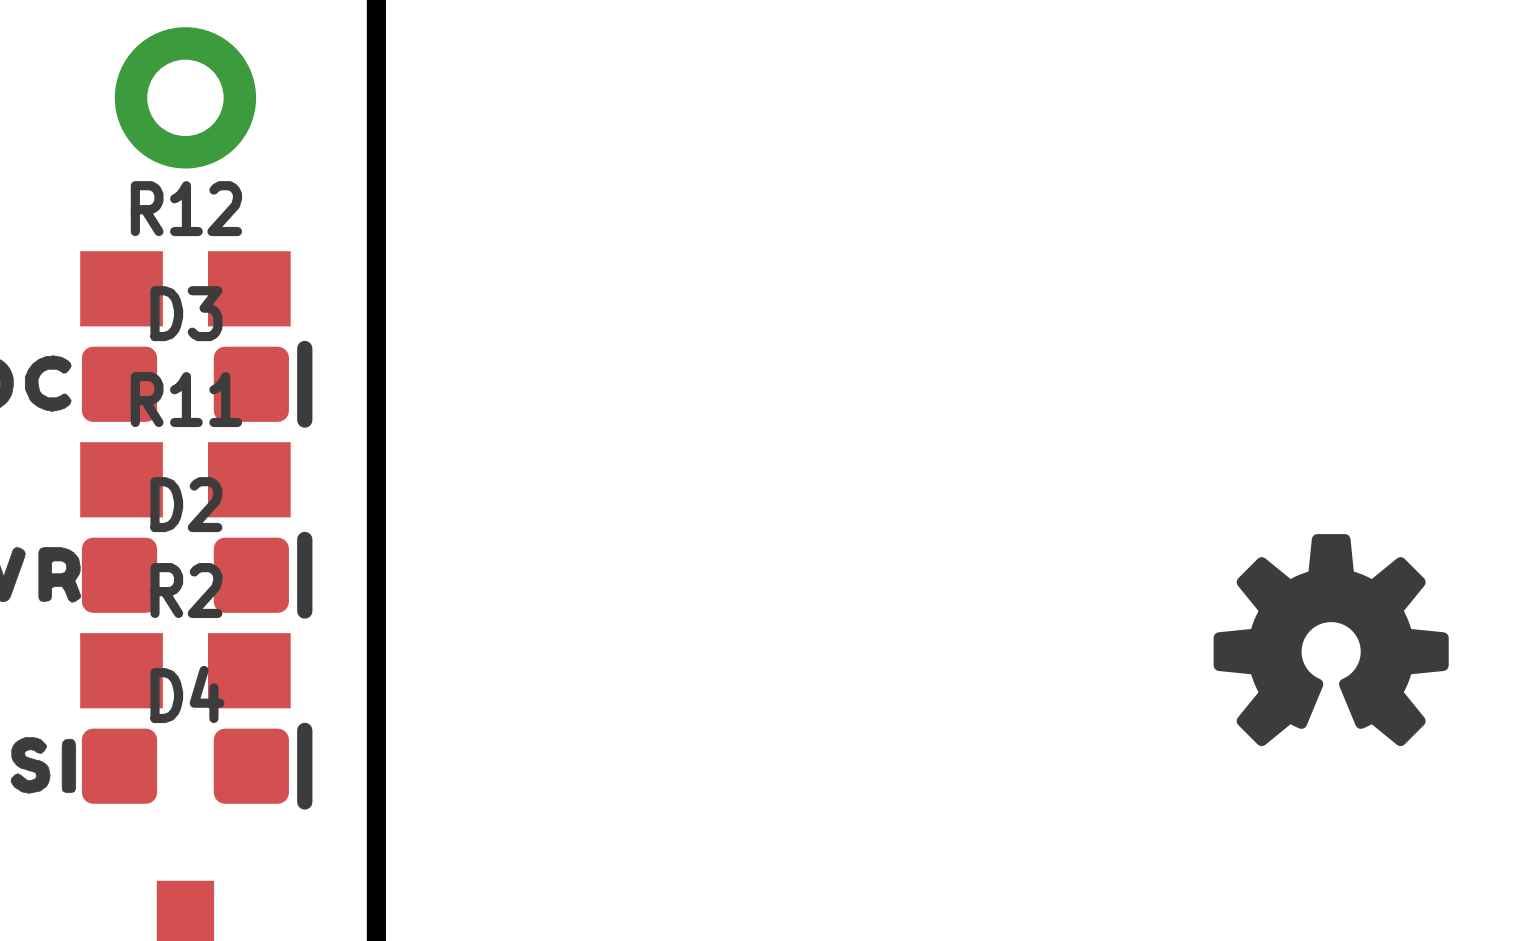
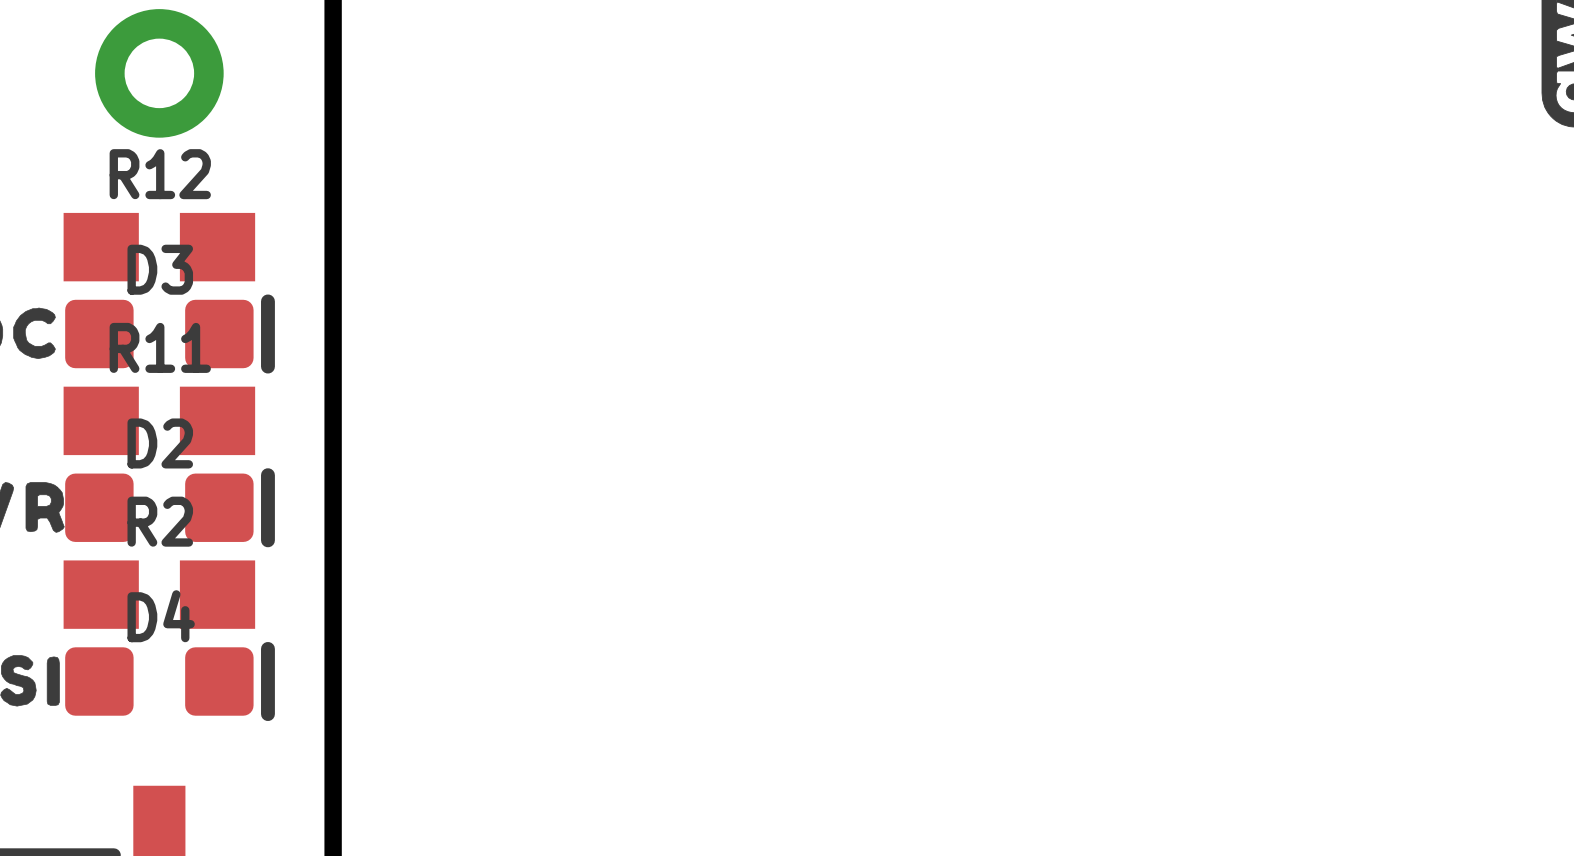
drawing: [1213, 534, 1449, 747] -> none

